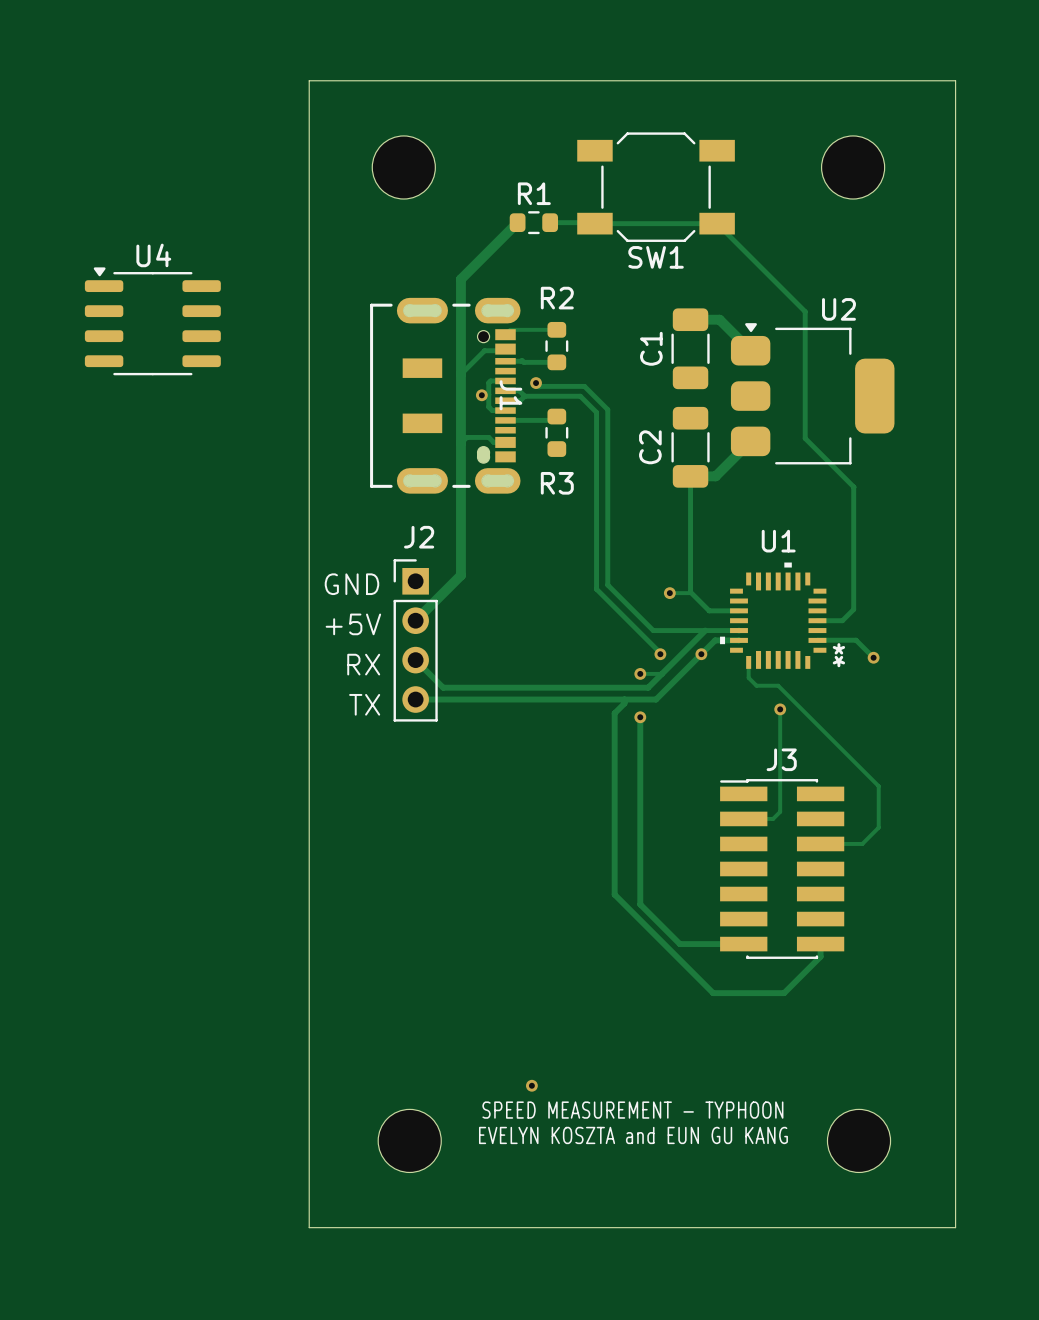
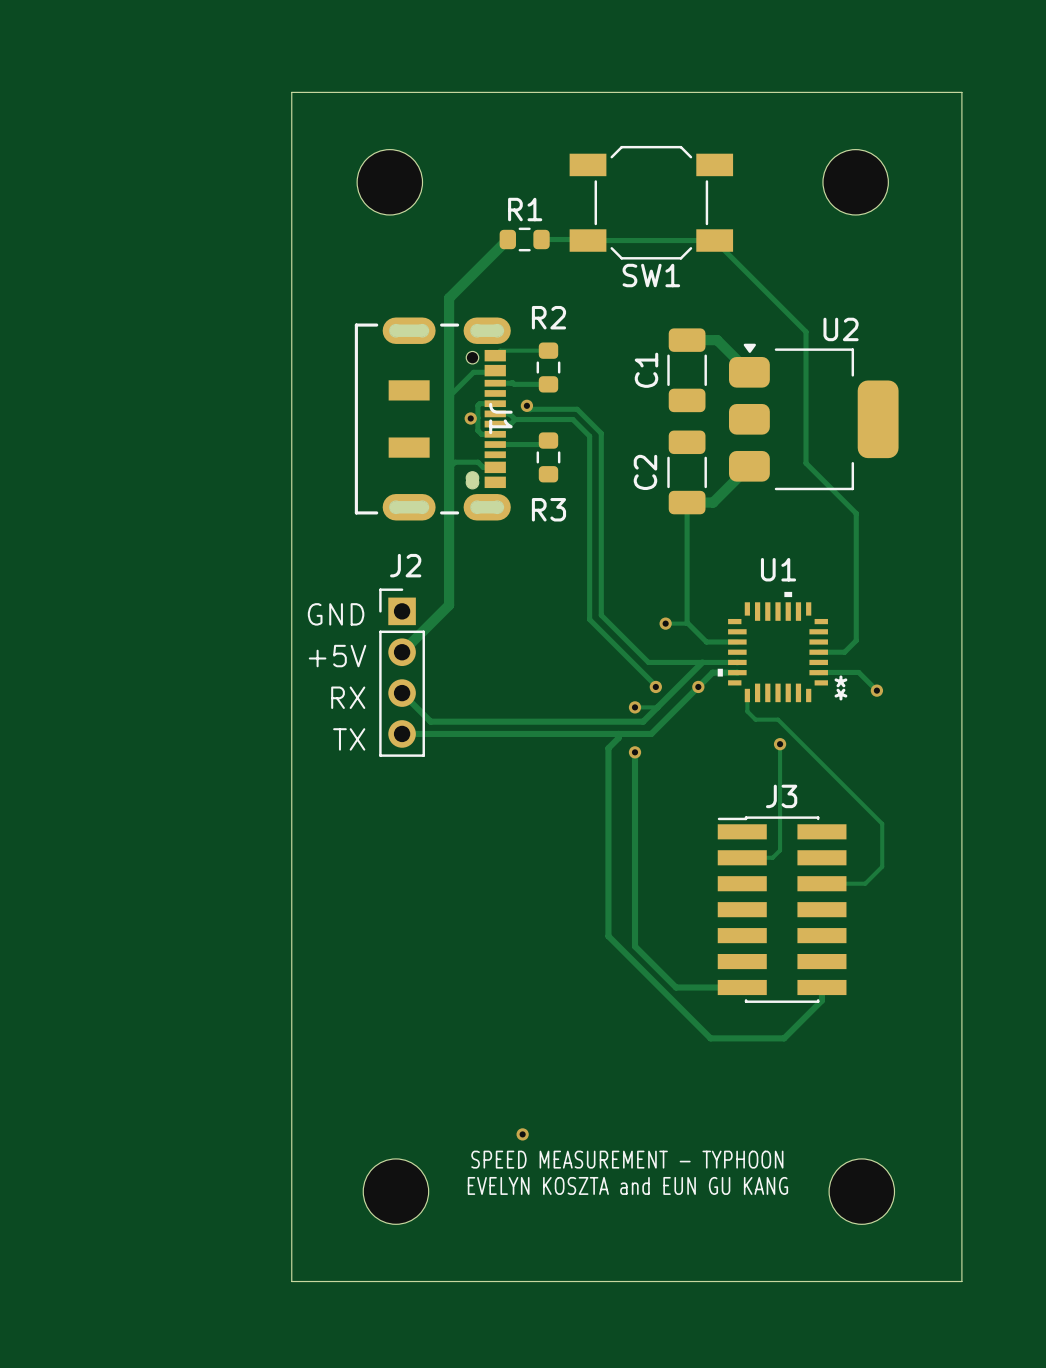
U4: (152, 321) -> none

